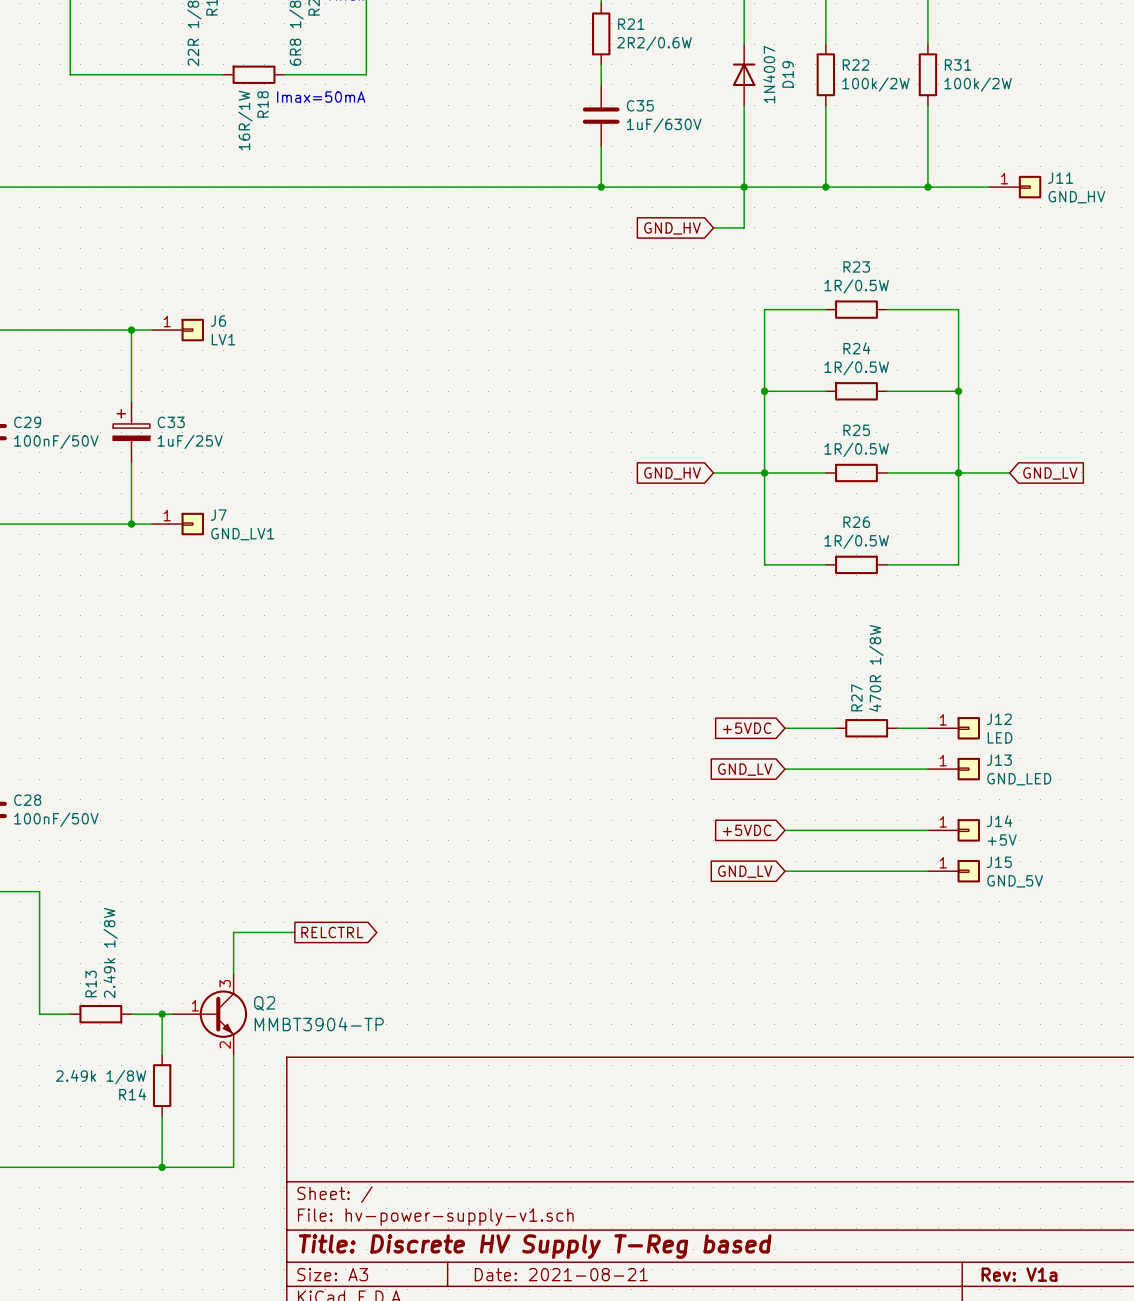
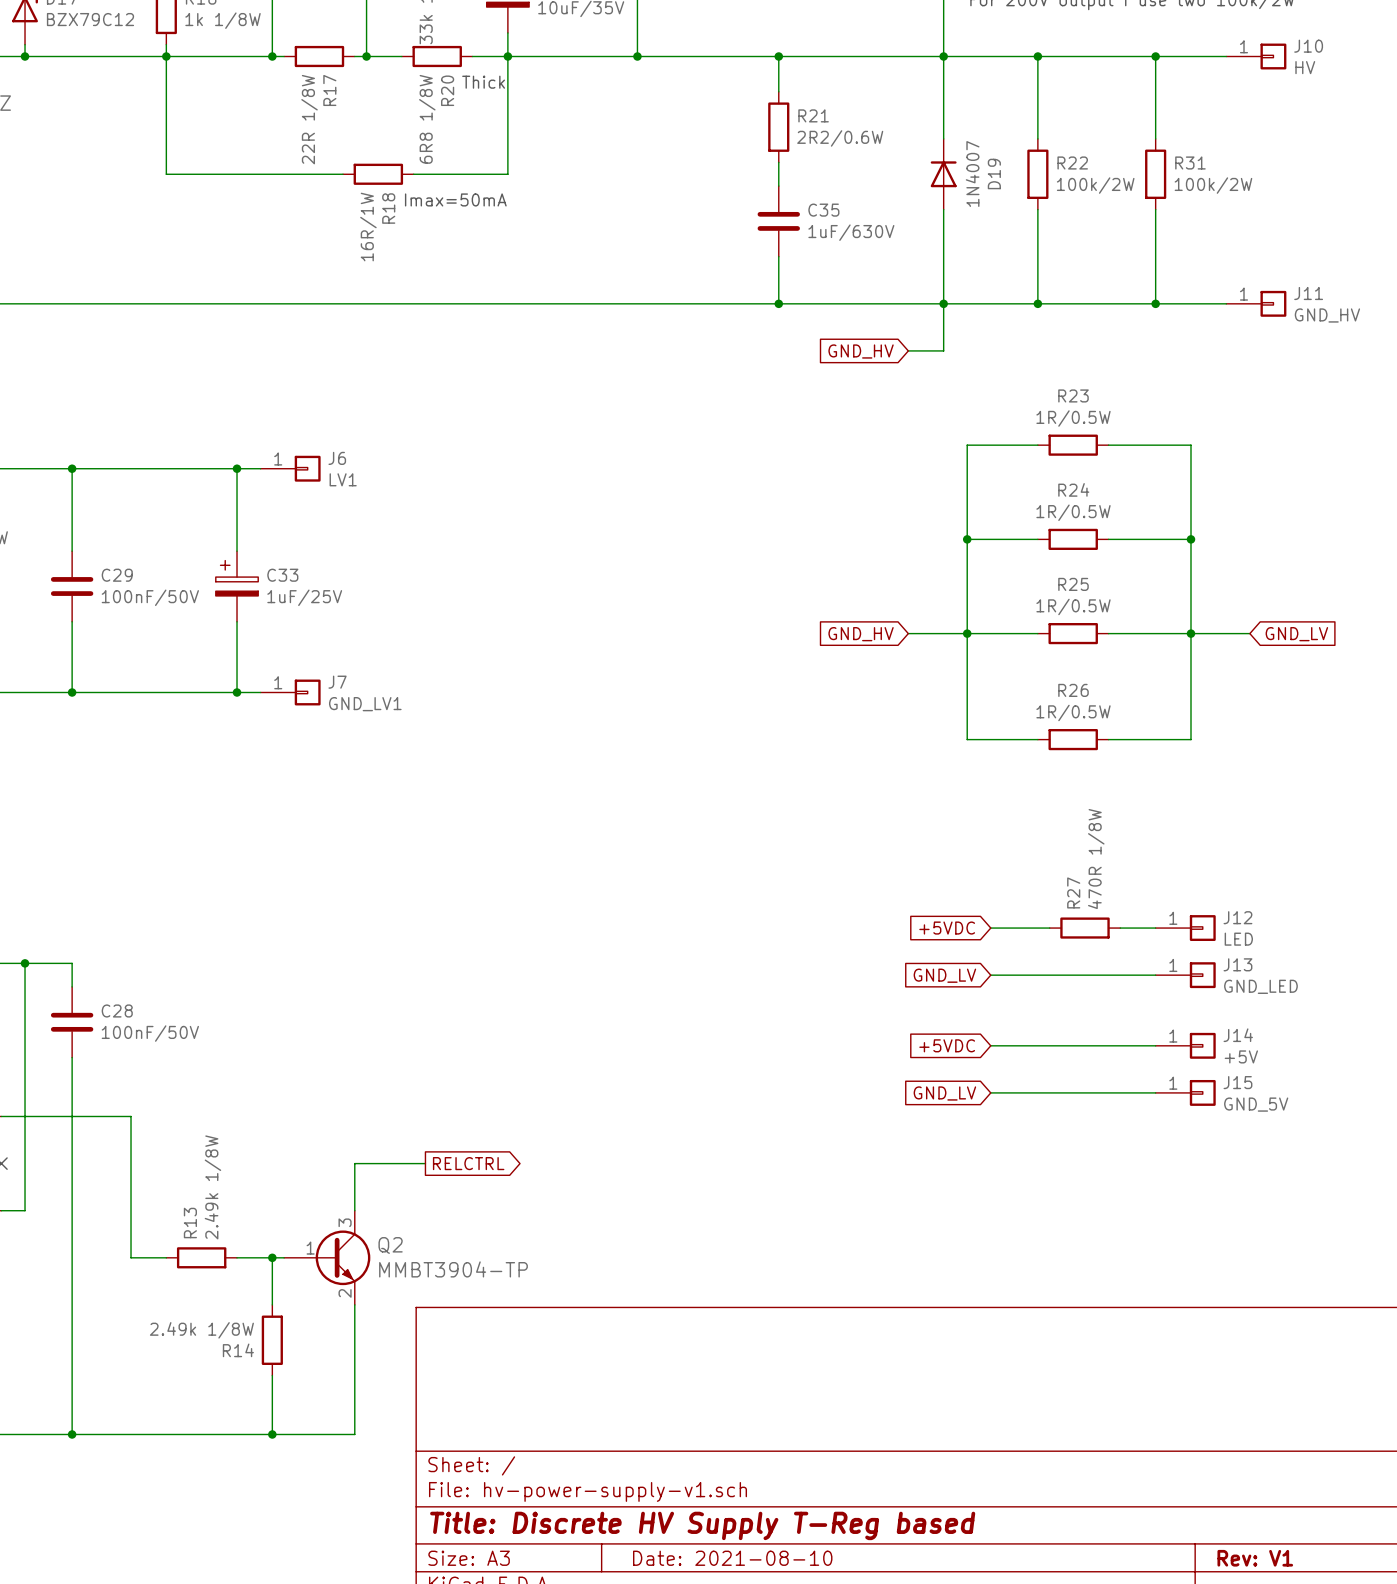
title block: Date: 2021-08-21 (561, 1274) -> Date: 2021-08-10 (732, 1558)
title block: Rev: V1a (1019, 1274) -> Rev: V1 (1255, 1558)

